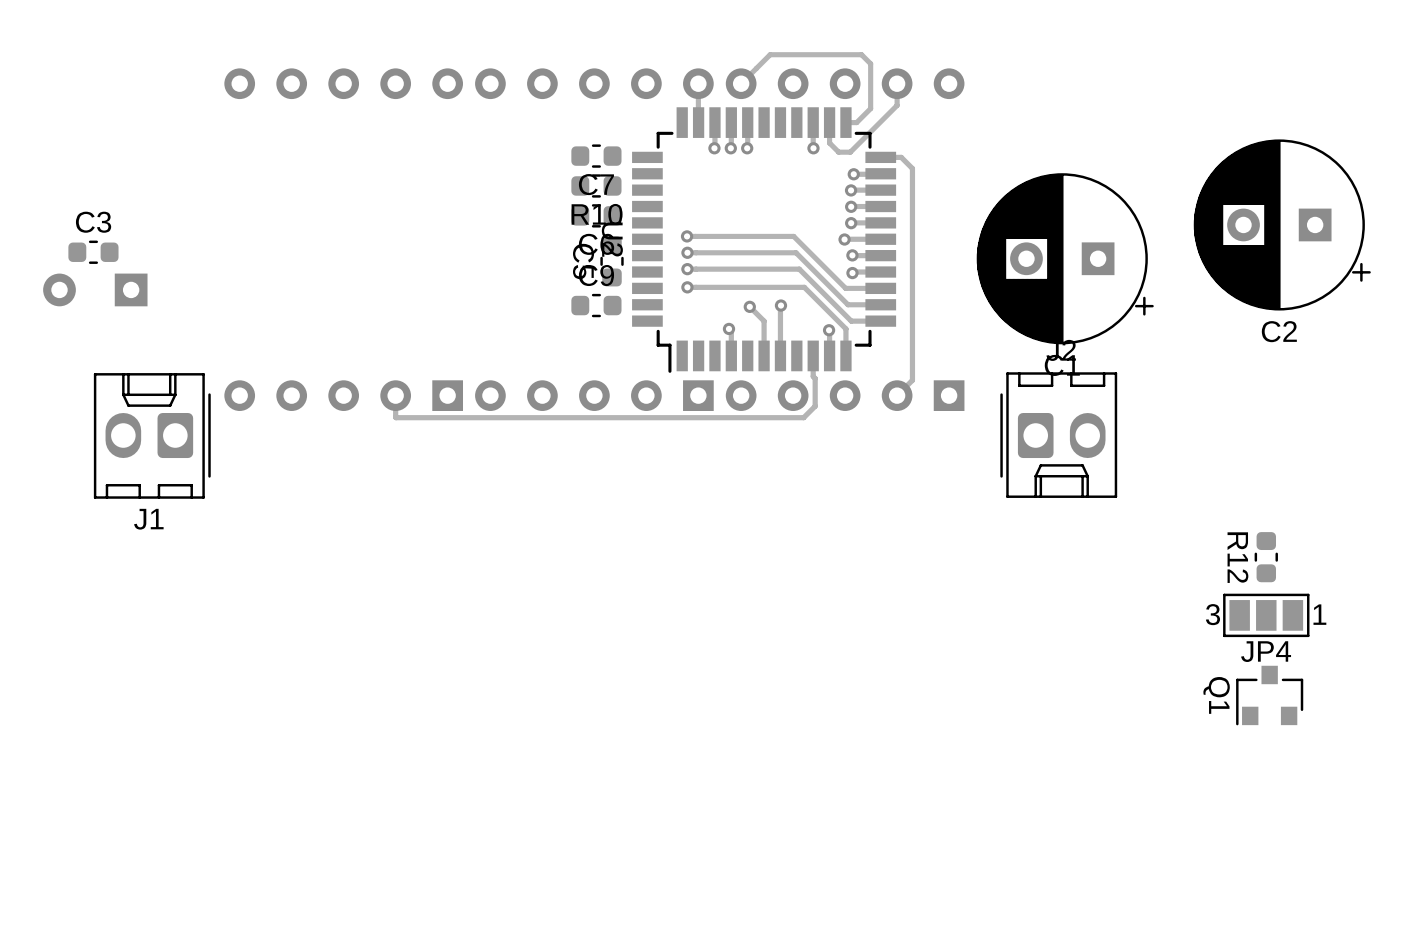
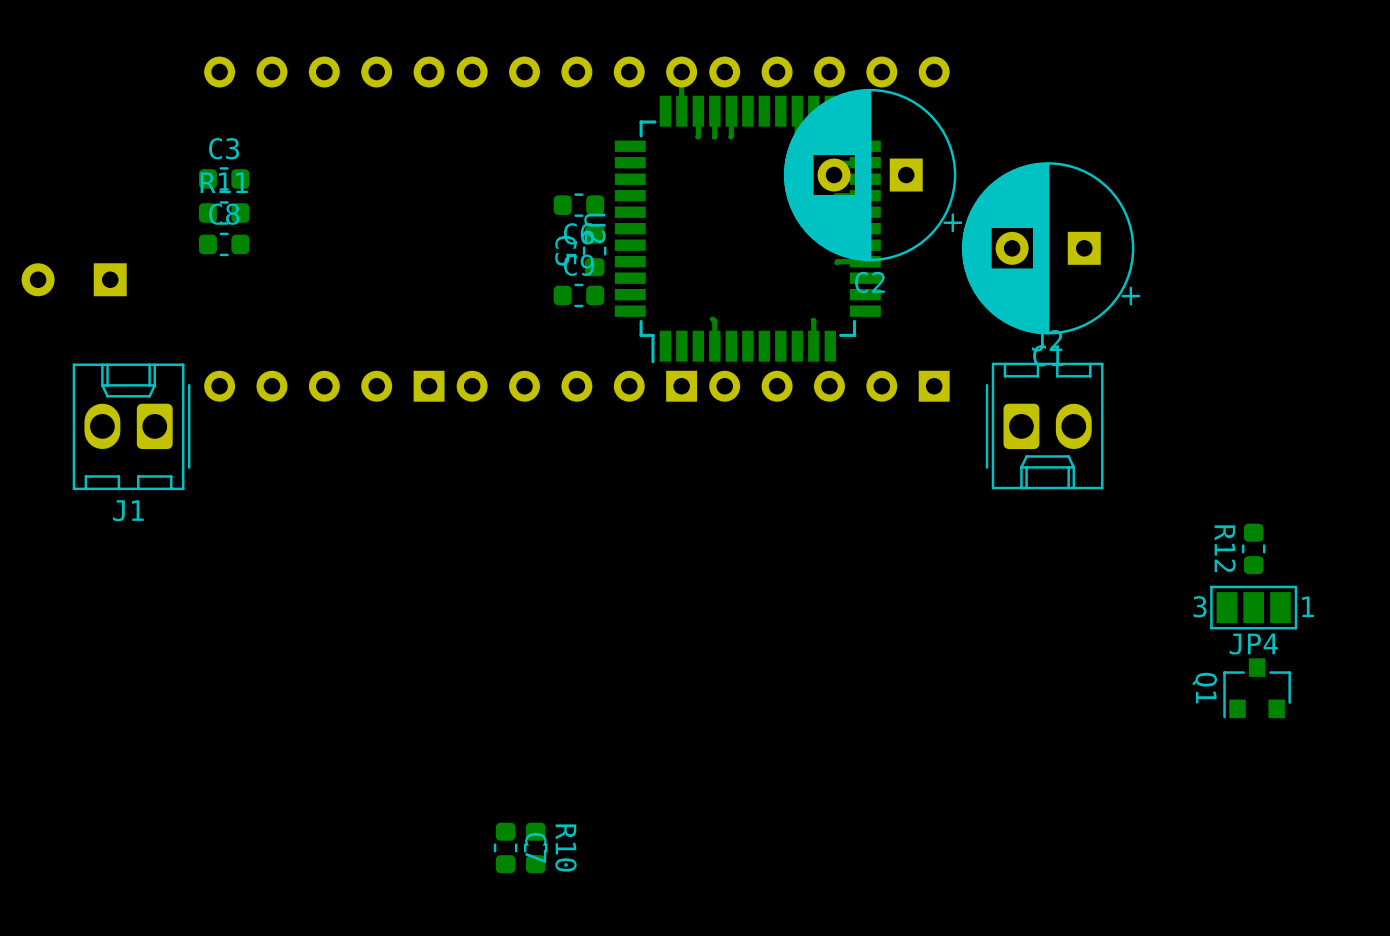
track: (741, 83) (770, 54) (861, 54) (870, 63) (870, 108) (856, 122) (845, 122) -> none
track: (897, 83) (897, 105) (850, 152) (838, 152) (829, 143) (829, 122) -> none
via: (714, 148) -> none
via: (730, 148) -> none
via: (747, 148) -> none
via: (813, 148) -> none
C7 rotation: 0° (596, 156) -> 90° clockwise (505, 847)
C7 position: (596, 156) -> (505, 847)
track: (880, 157) (901, 157) (912, 168) (912, 380) (897, 395) -> none
via: (853, 174) -> none
C7 name position: C7 (596, 184) -> C7 (535, 847)
R10 rotation: 0° (596, 185) -> 90° clockwise (535, 847)
R10 position: (596, 185) -> (535, 847)
via: (851, 190) -> none
via: (851, 206) -> none
R10 name position: R10 (597, 214) -> R10 (565, 848)
R11: none -> (224, 212)
via: (851, 223) -> none
C2 position: (1282, 224) -> (873, 175)
track: (687, 236) (793, 236) (845, 288) (880, 288) -> none
via: (687, 236) -> none
via: (844, 239) -> none
C3 position: (93, 252) -> (224, 178)
track: (687, 252) (796, 252) (848, 304) (880, 304) -> none
via: (687, 252) -> none
C8: none -> (224, 244)
via: (852, 255) -> none
track: (687, 269) (799, 269) (851, 321) (880, 321) -> none
via: (687, 269) -> none
via: (852, 273) -> none
track: (687, 287) (804, 287) (845, 328) (845, 355) -> none
via: (687, 287) -> none
track: (780, 305) (780, 355) -> none
via: (780, 305) -> none
track: (749, 306) (764, 321) (764, 355) -> none
via: (749, 306) -> none
via: (728, 328) -> none
via: (829, 330) -> none
track: (813, 355) (815, 406) (803, 417) (395, 417) (395, 395) -> none

